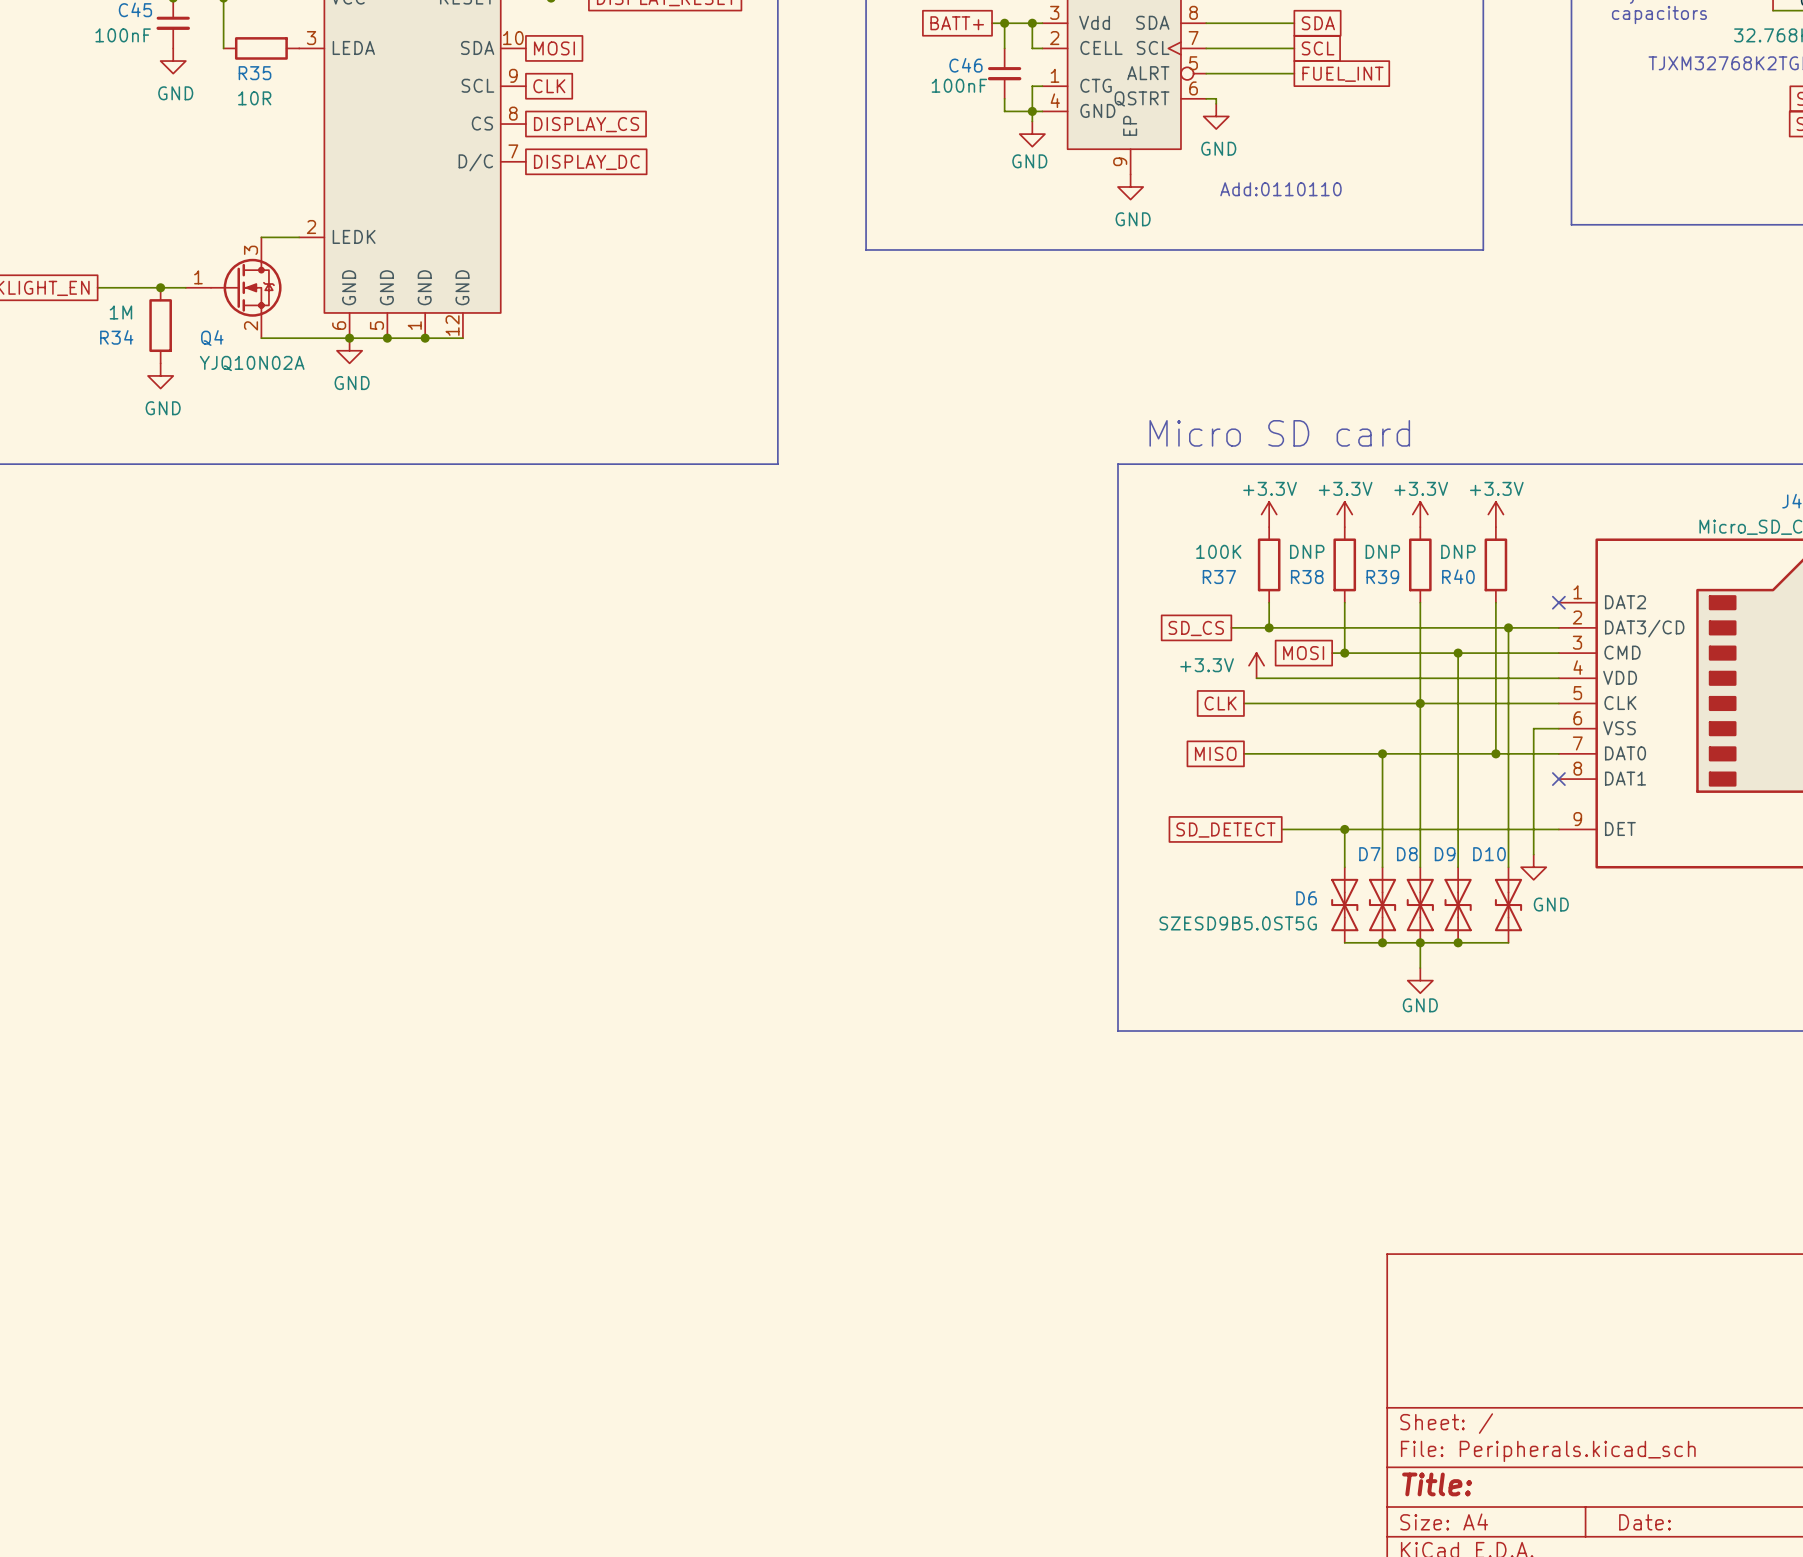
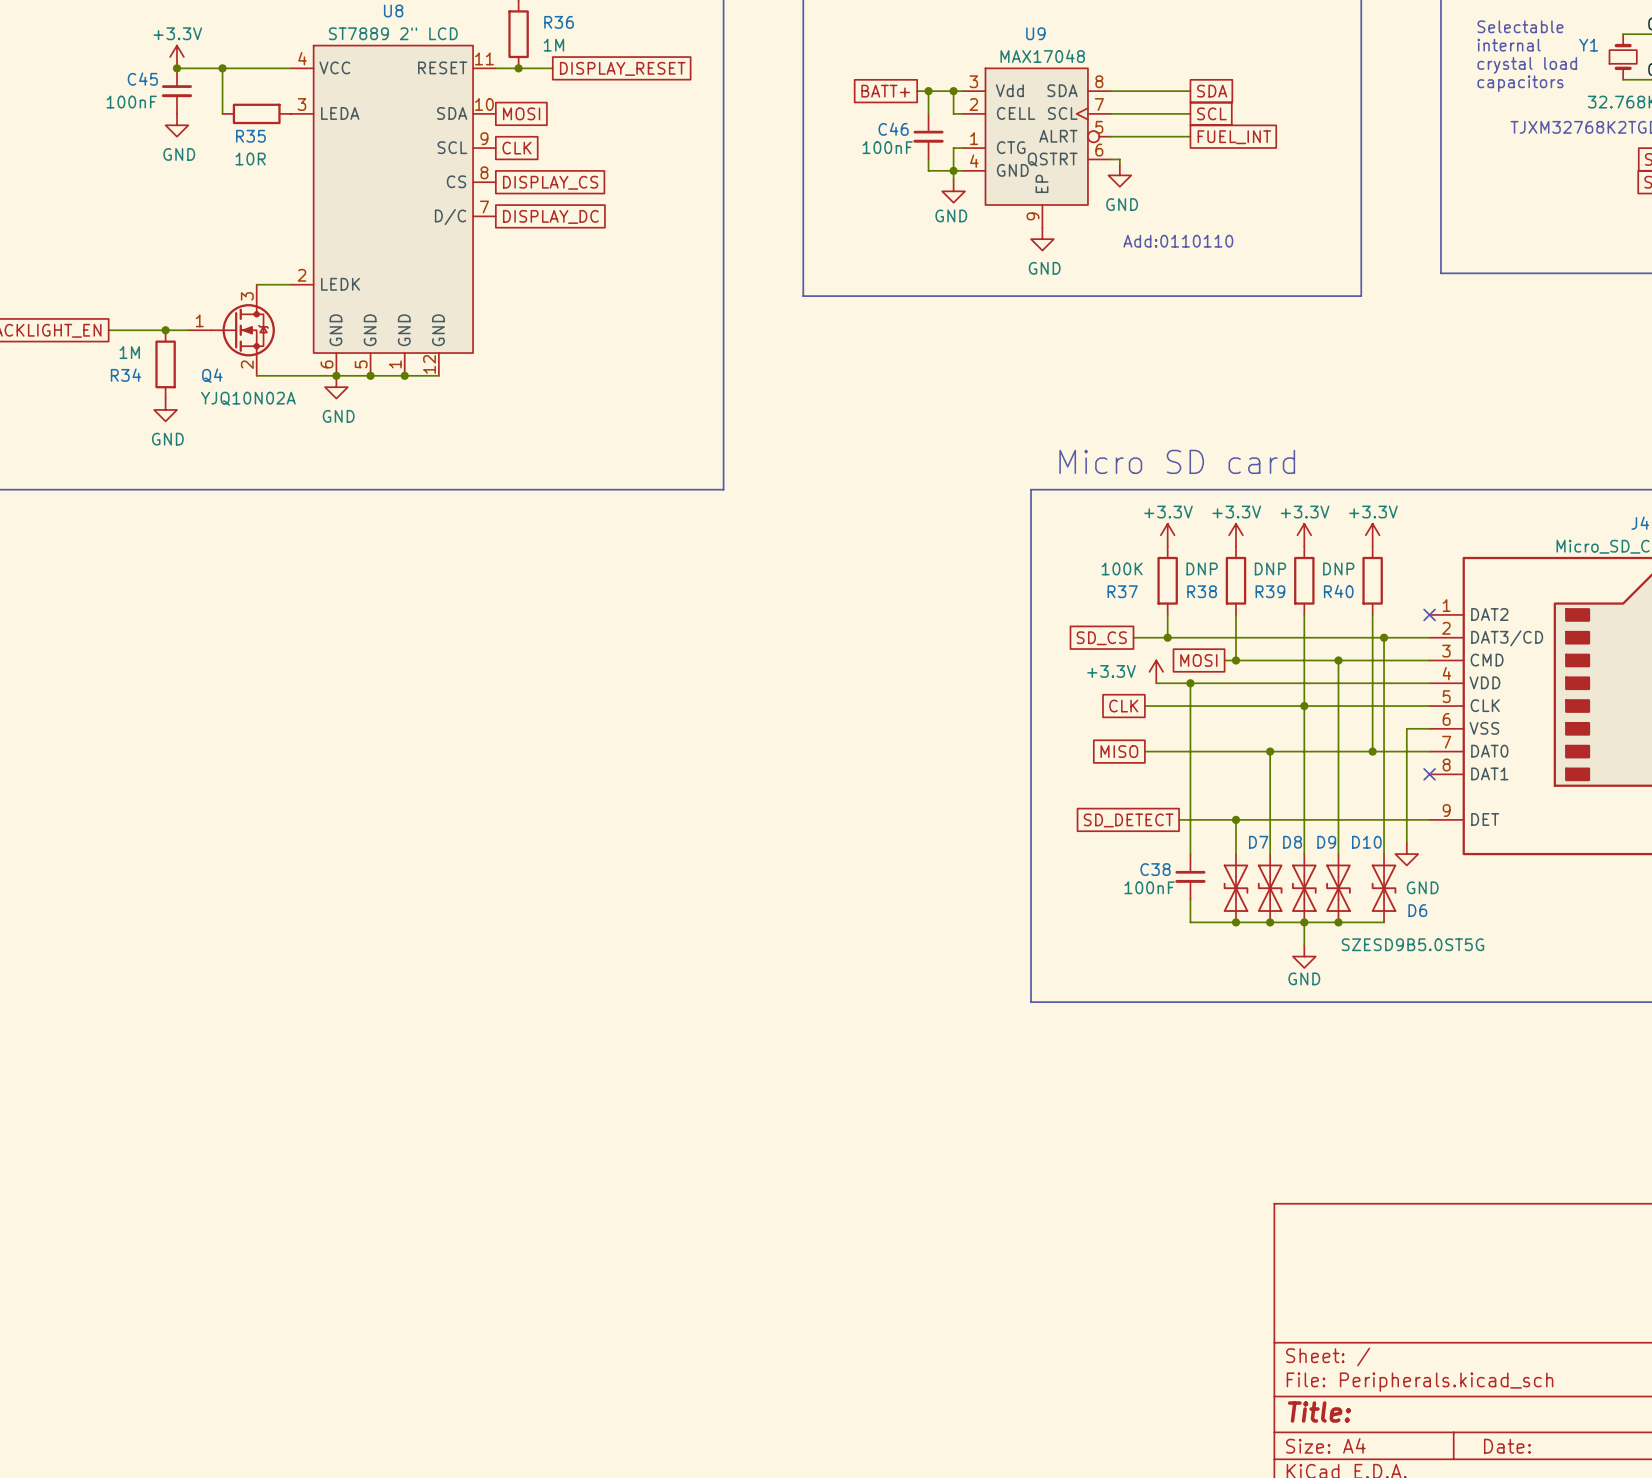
wire: none -> (1190, 683) (1190, 854)
junction: none -> (1190, 683)
C38: none -> 100nF (1190, 876)
D6 name position: D6 (1306, 898) -> D6 (1417, 910)
wire: none -> (1190, 899) (1190, 922) (1235, 922)
D6 value position: SZESD9B5.0ST5G (1238, 923) -> SZESD9B5.0ST5G (1412, 944)
junction: none -> (1235, 922)

